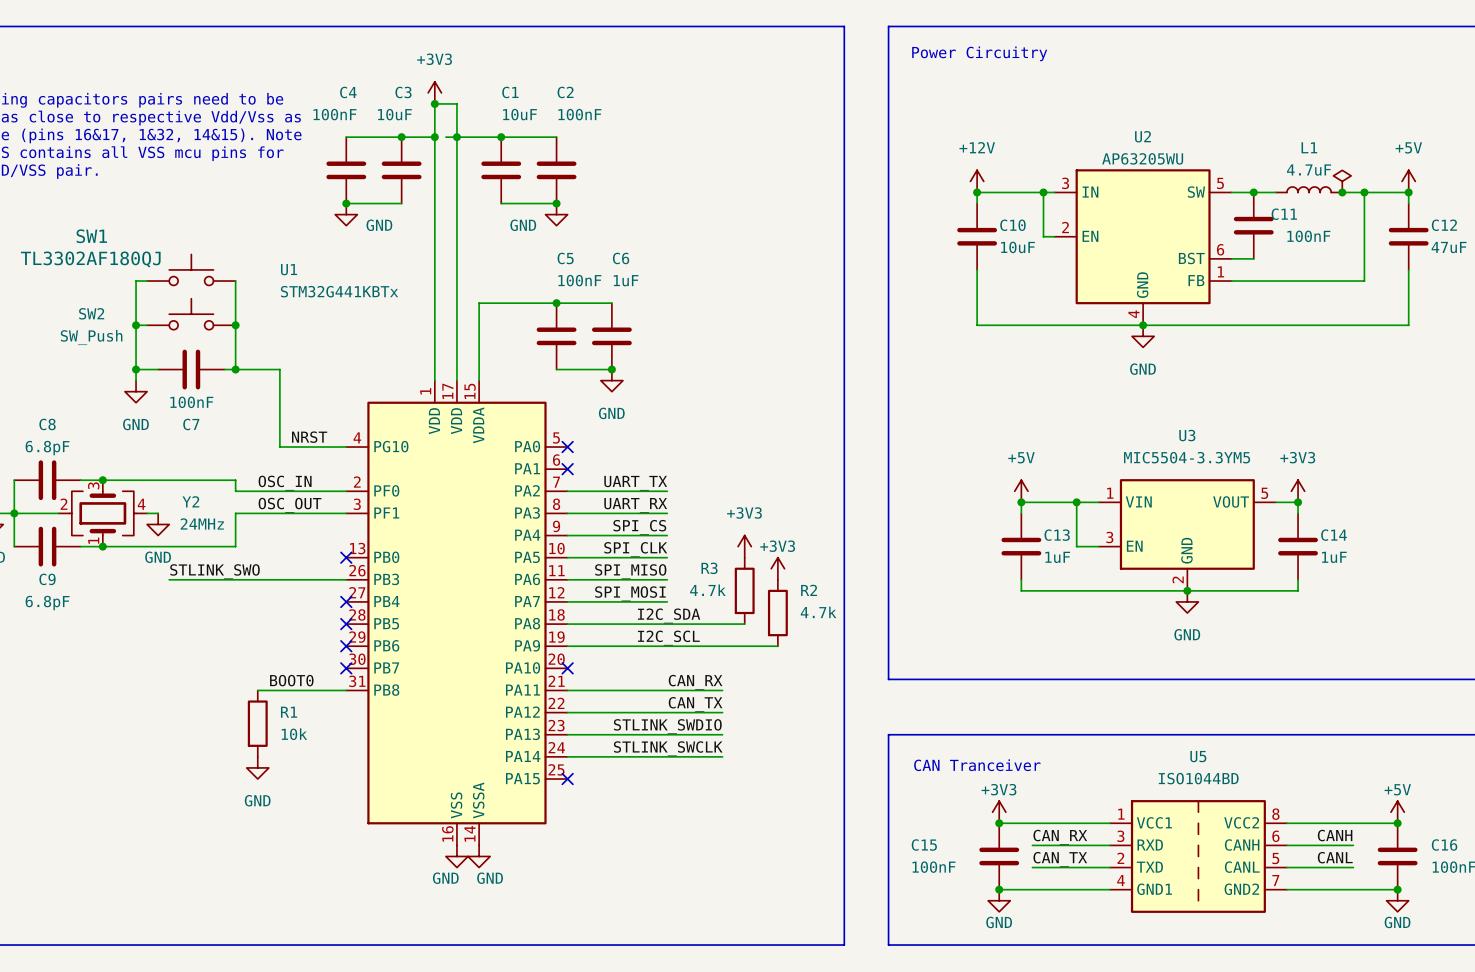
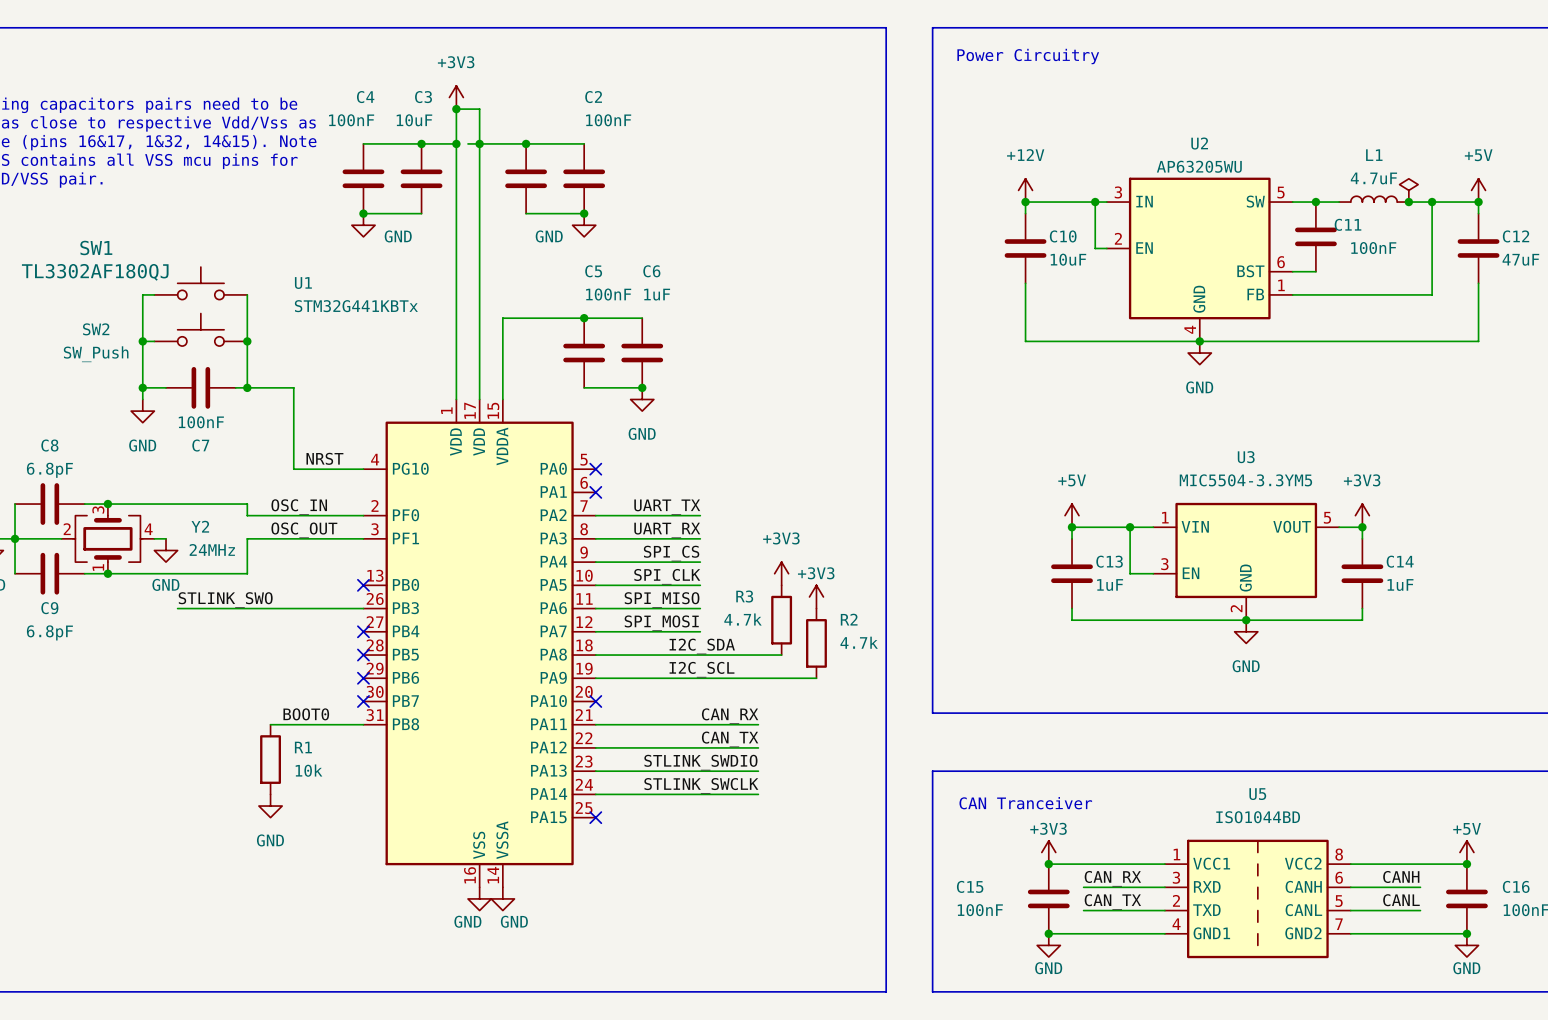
C1 name: C1 (510, 92) -> none
C1 value: 10uF (519, 114) -> none

